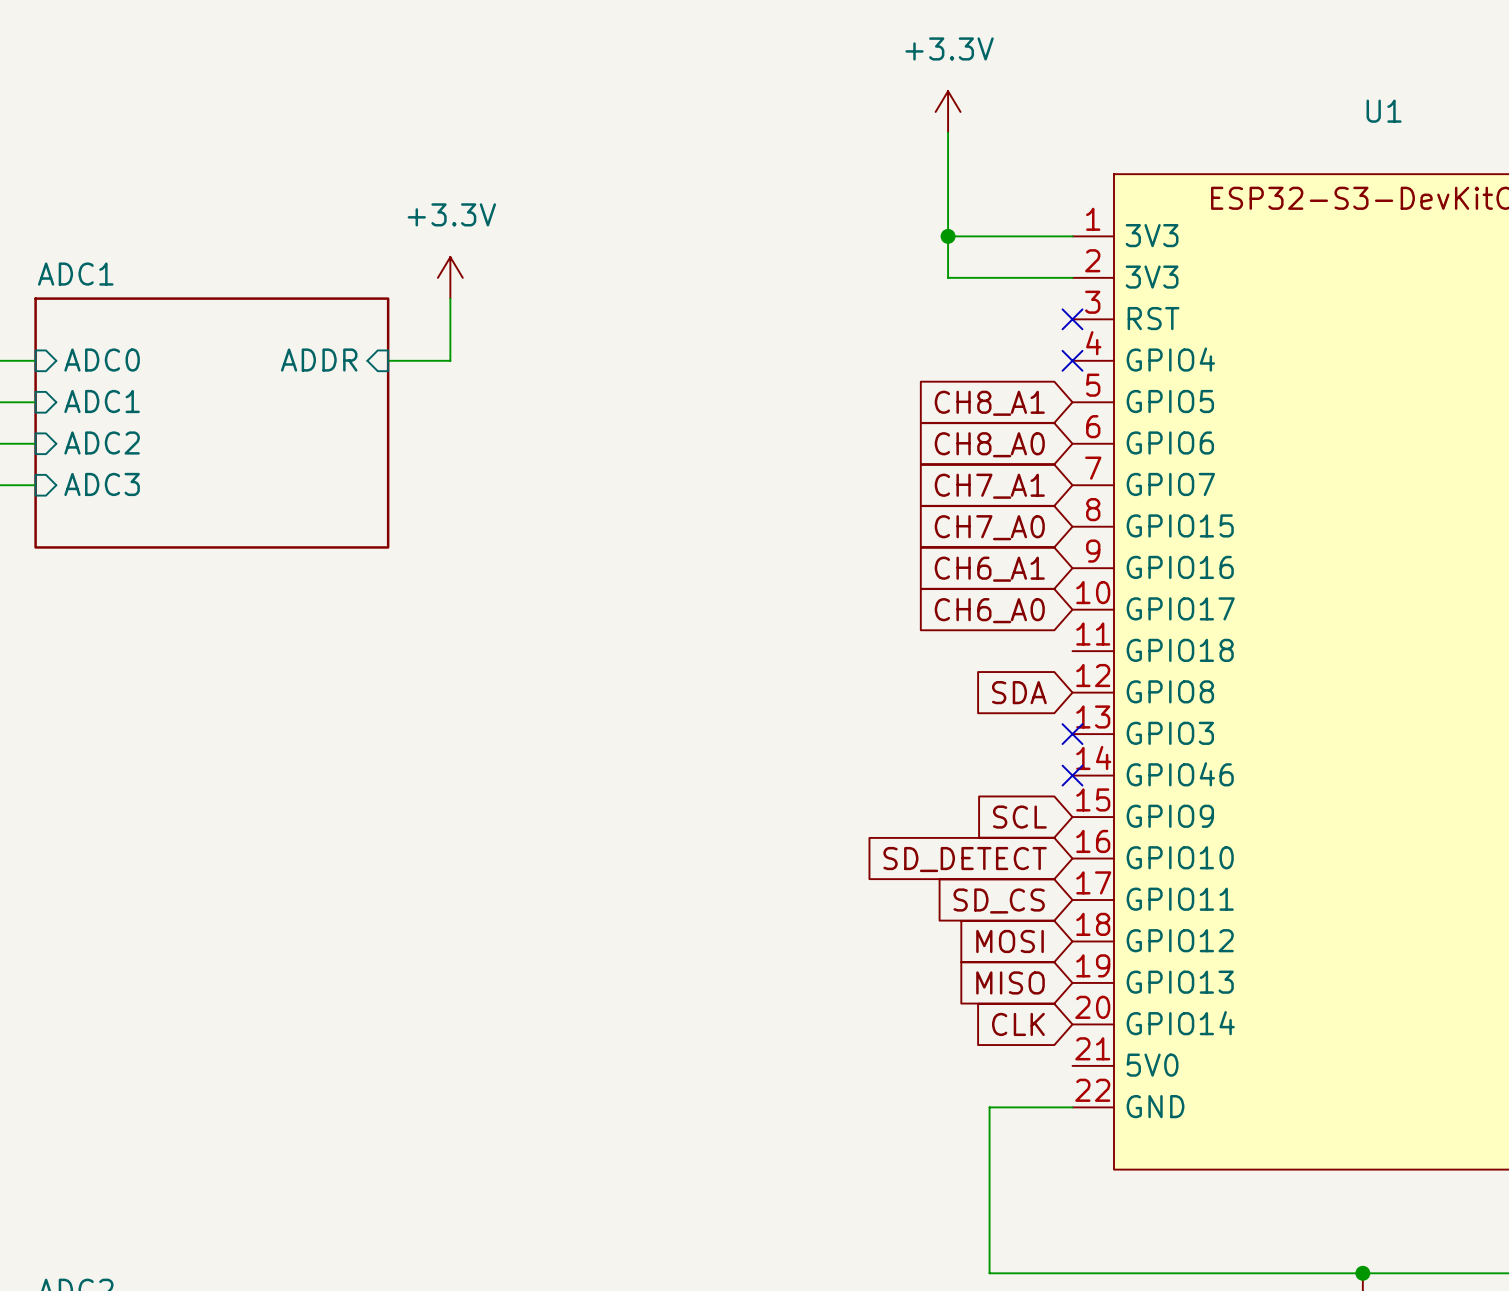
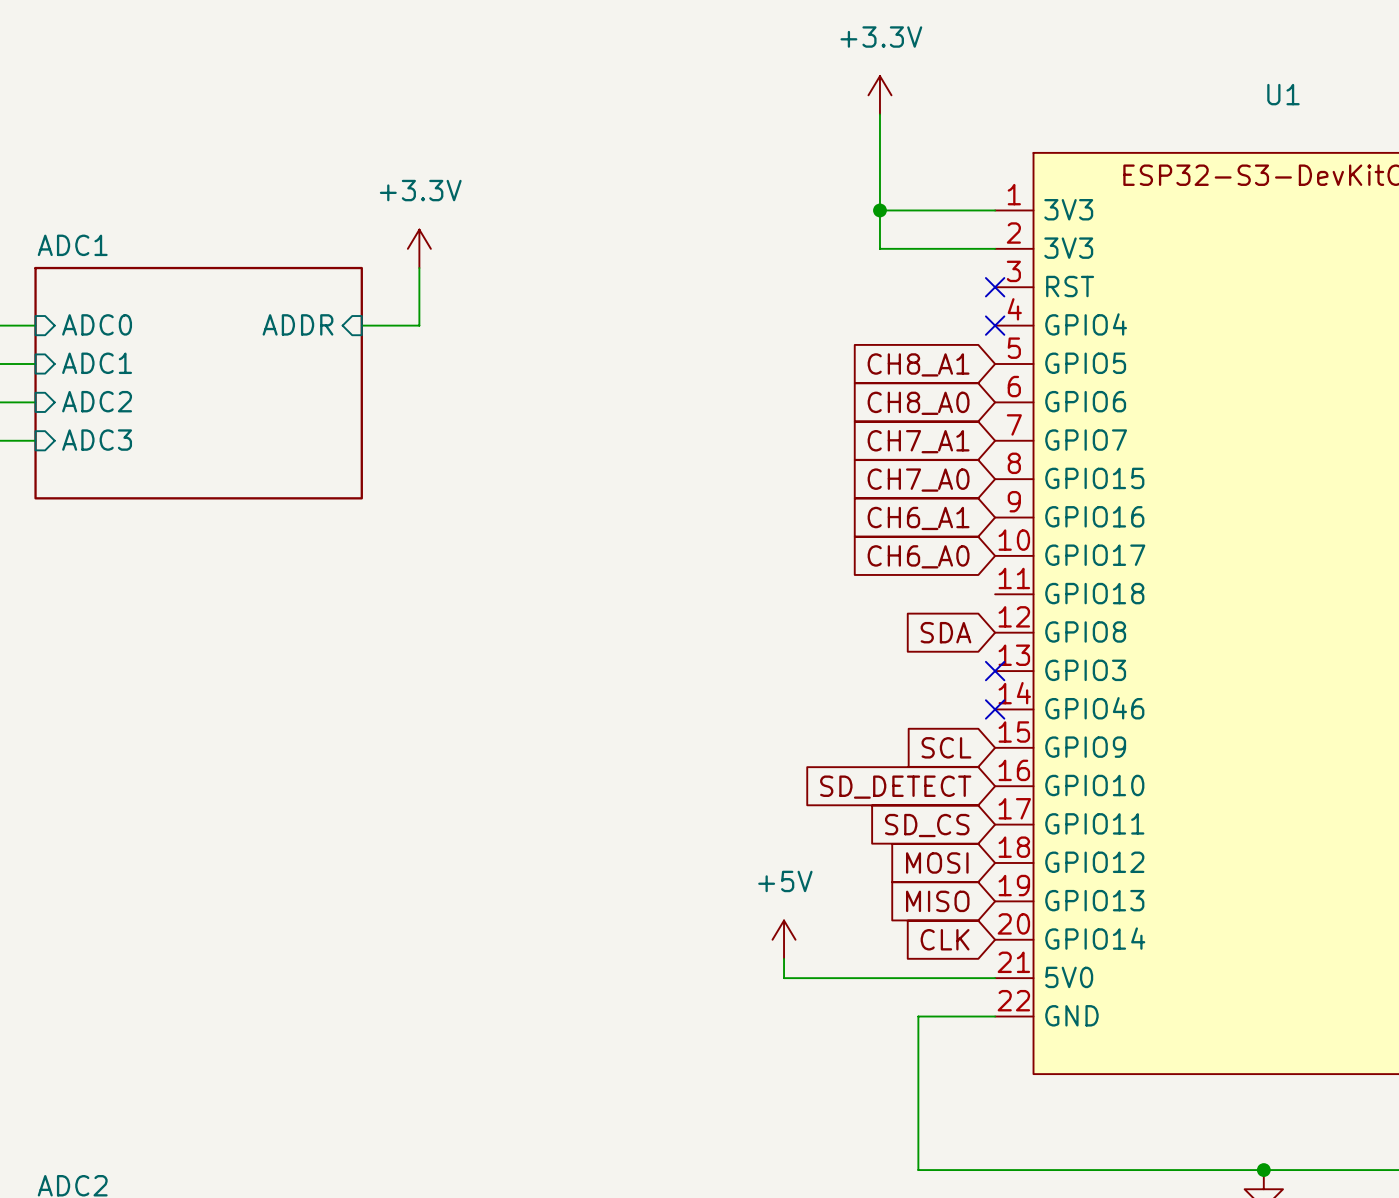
power symbol: none -> +5V (784, 939)
wire: none -> (784, 958) (784, 978) (995, 978)

